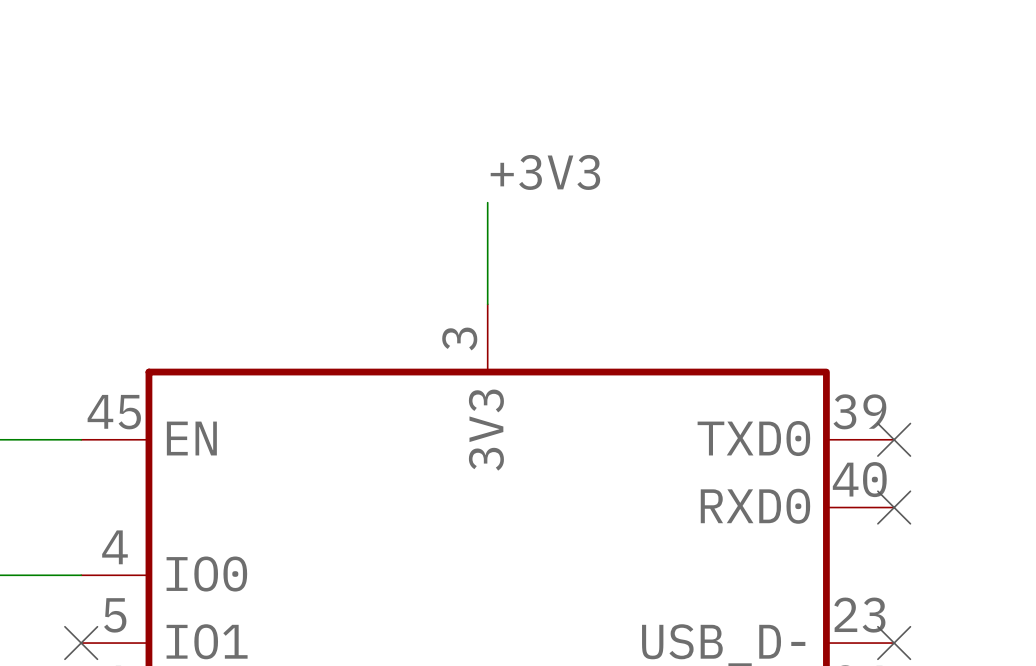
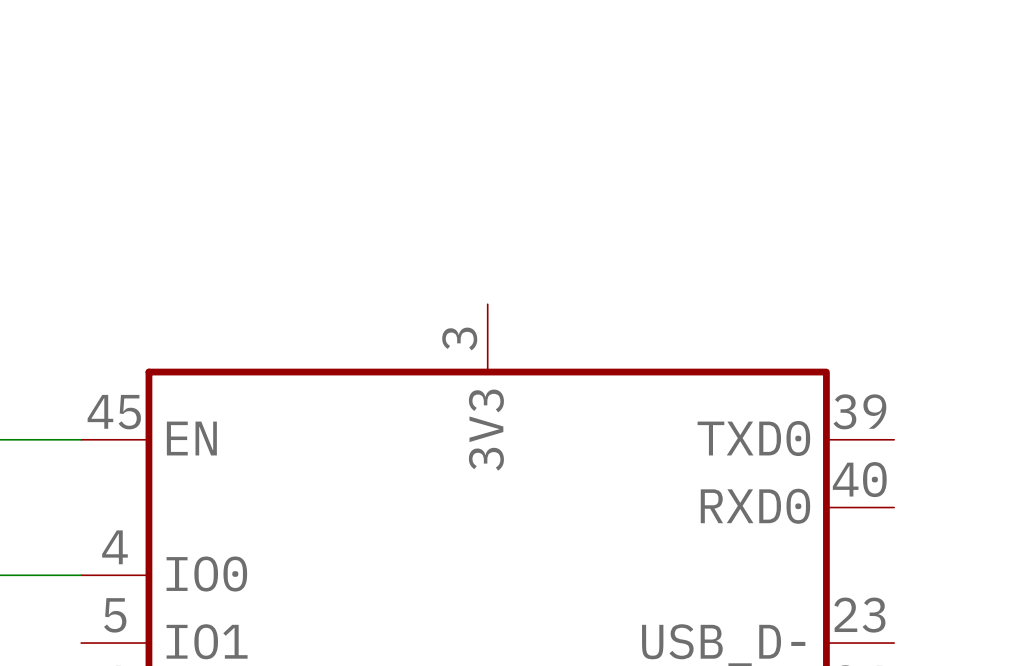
label: +3V3 (545, 172) -> none
wire: (487, 202) (487, 304) -> none
no-connect mark: (894, 439) -> none
no-connect mark: (894, 507) -> none
no-connect mark: (81, 643) -> none
no-connect mark: (894, 643) -> none

